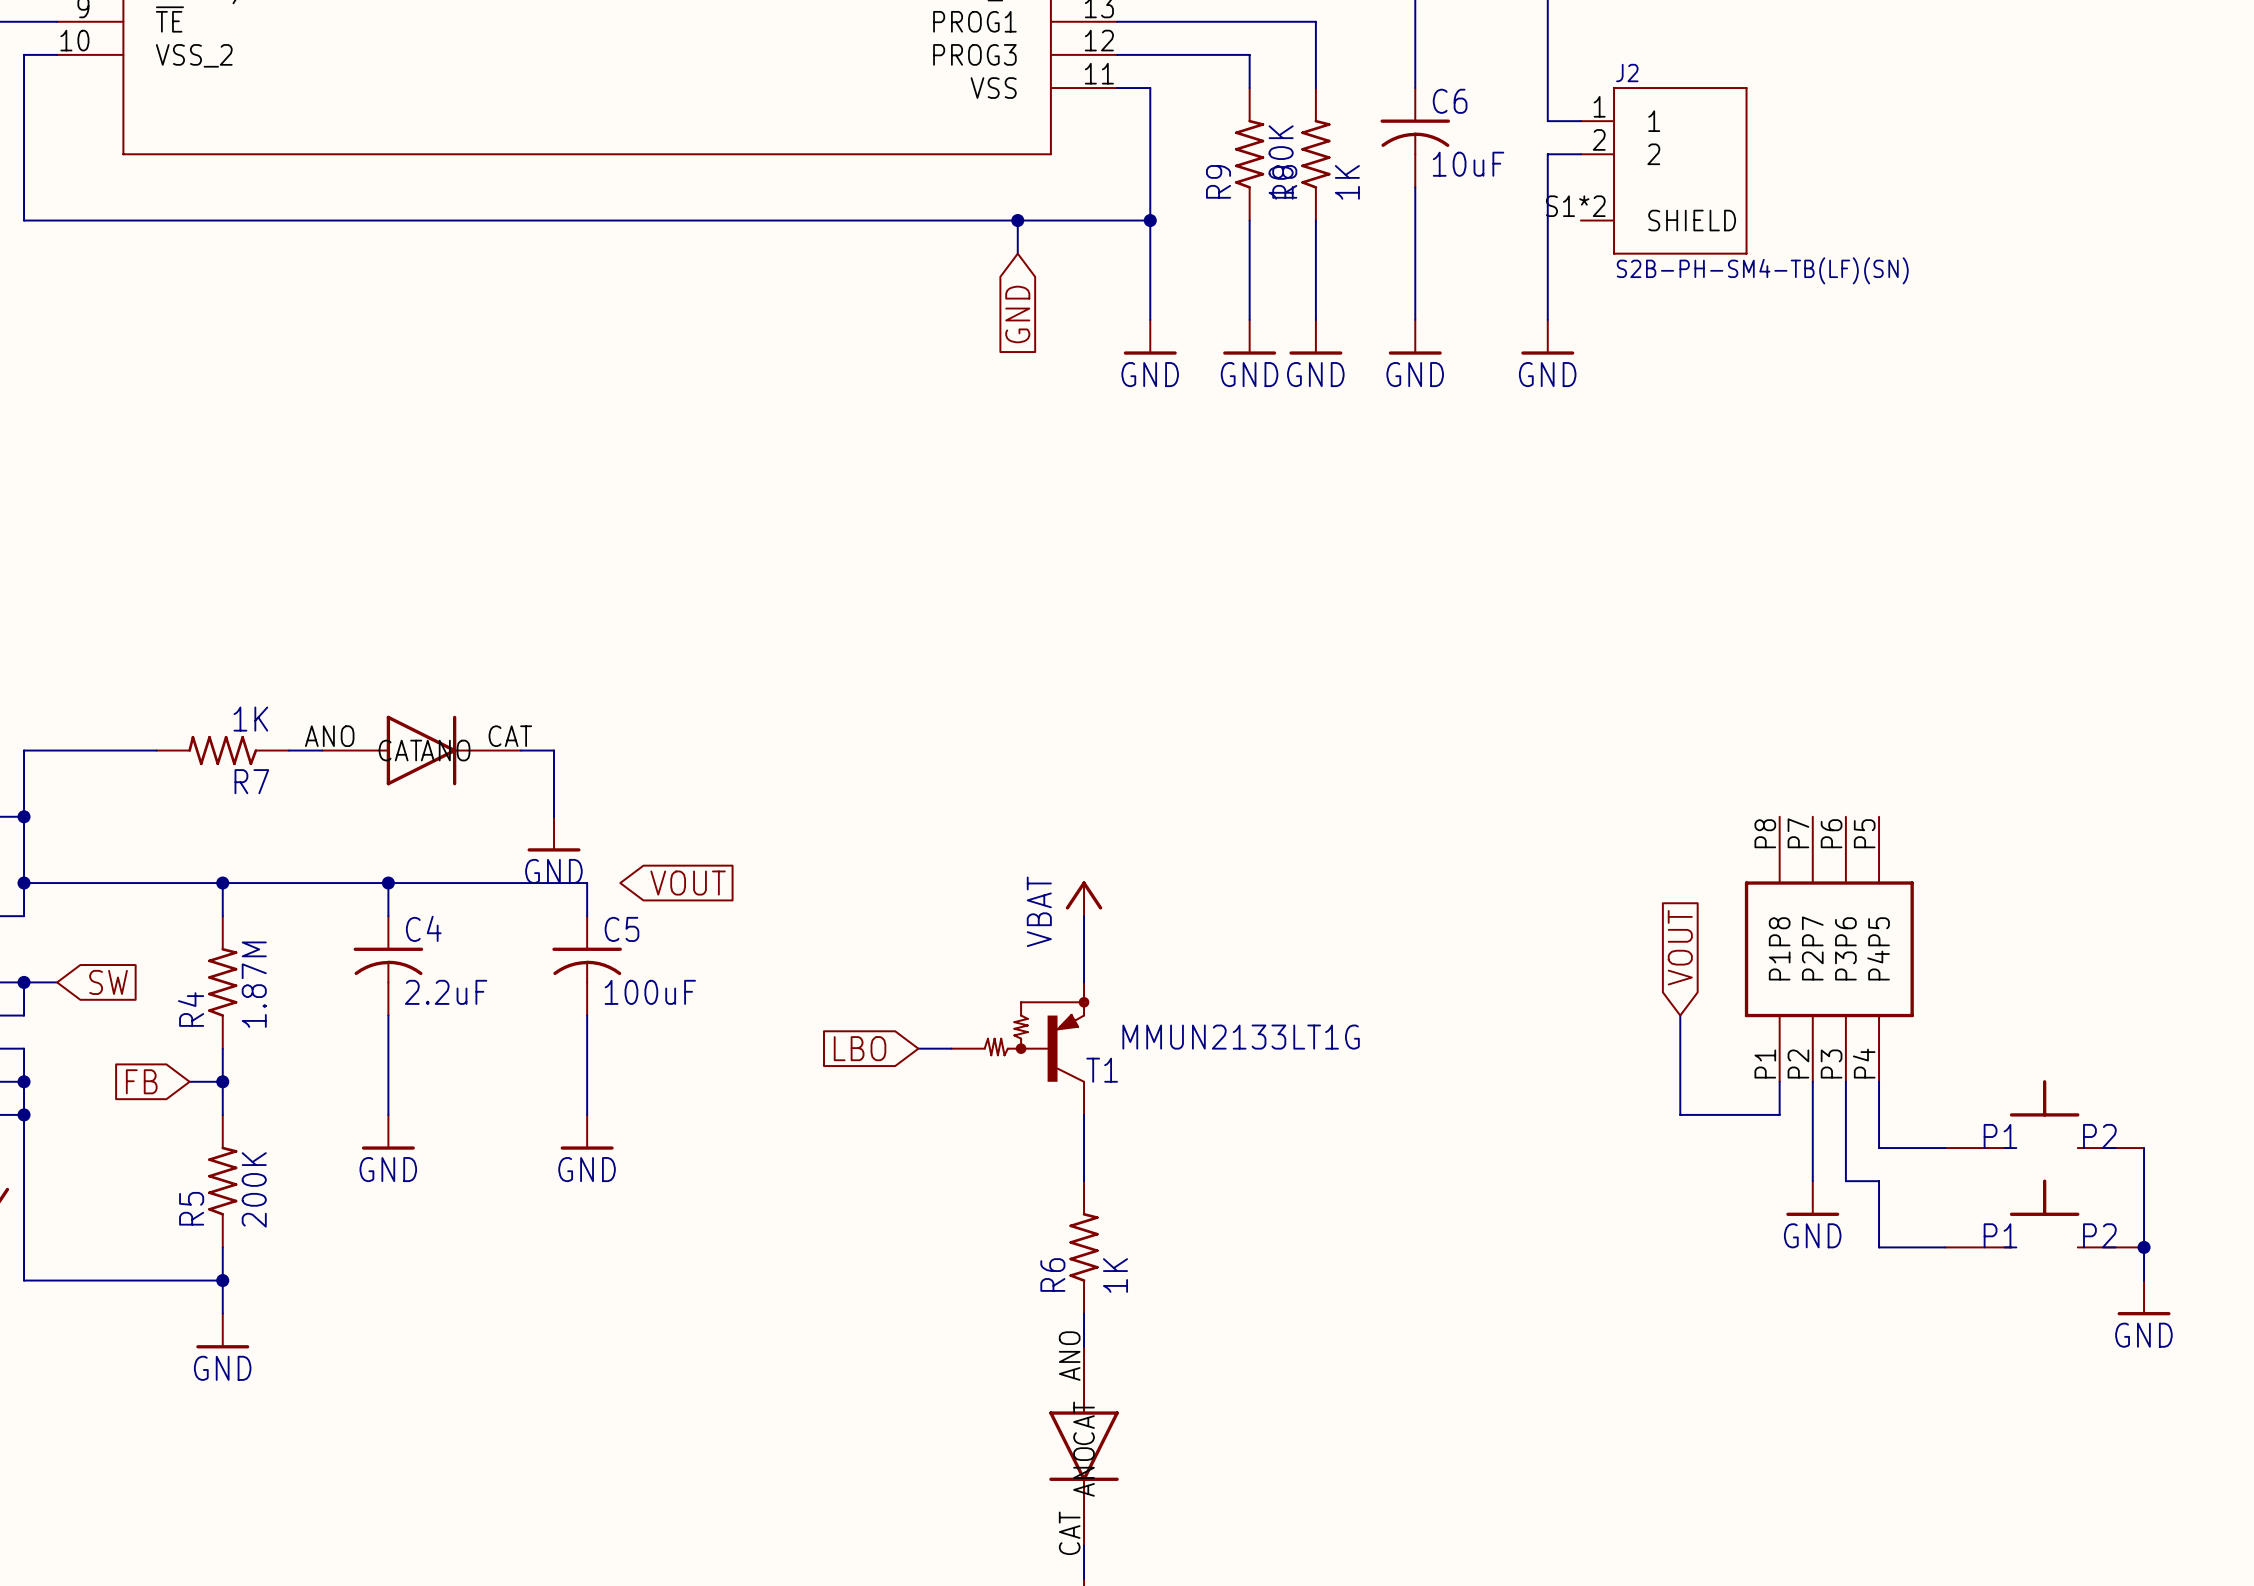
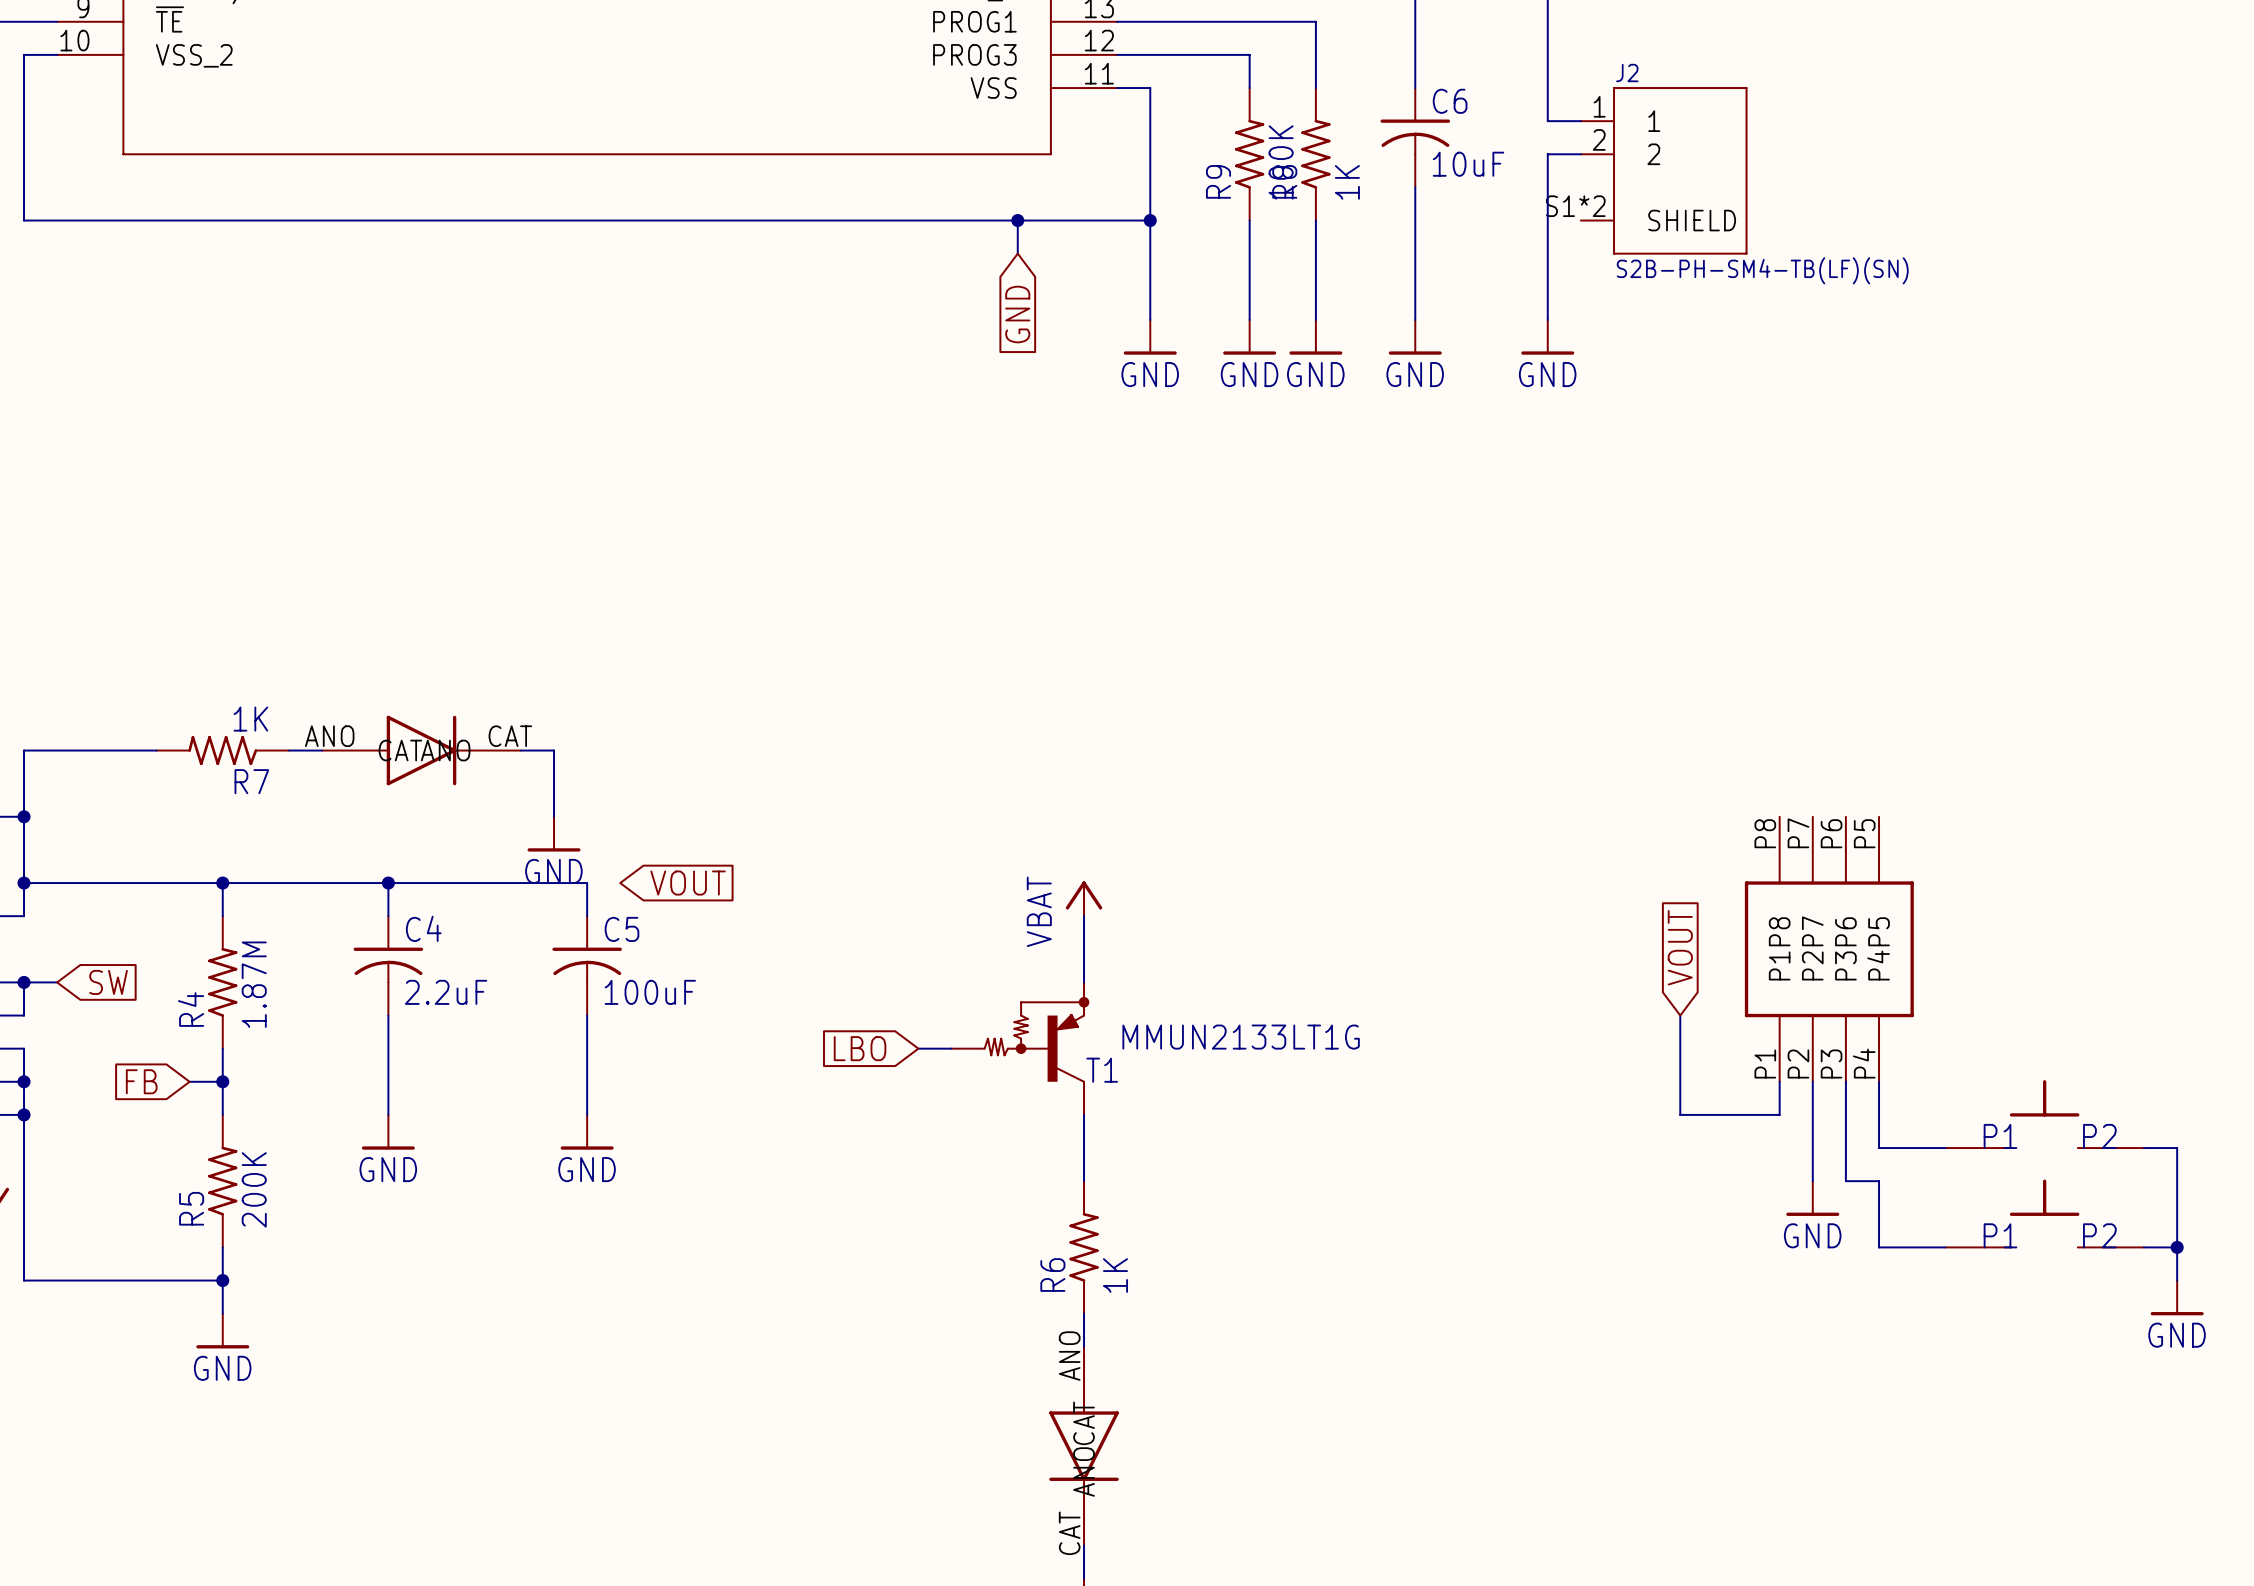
wire: (2144, 1148) (2144, 1280) -> (2144, 1148) (2177, 1148) (2177, 1280)
wire: none -> (2144, 1247) (2177, 1247)
junction position: (2144, 1247) -> (2177, 1247)
power symbol position: GND (2144, 1297) -> GND (2177, 1297)

